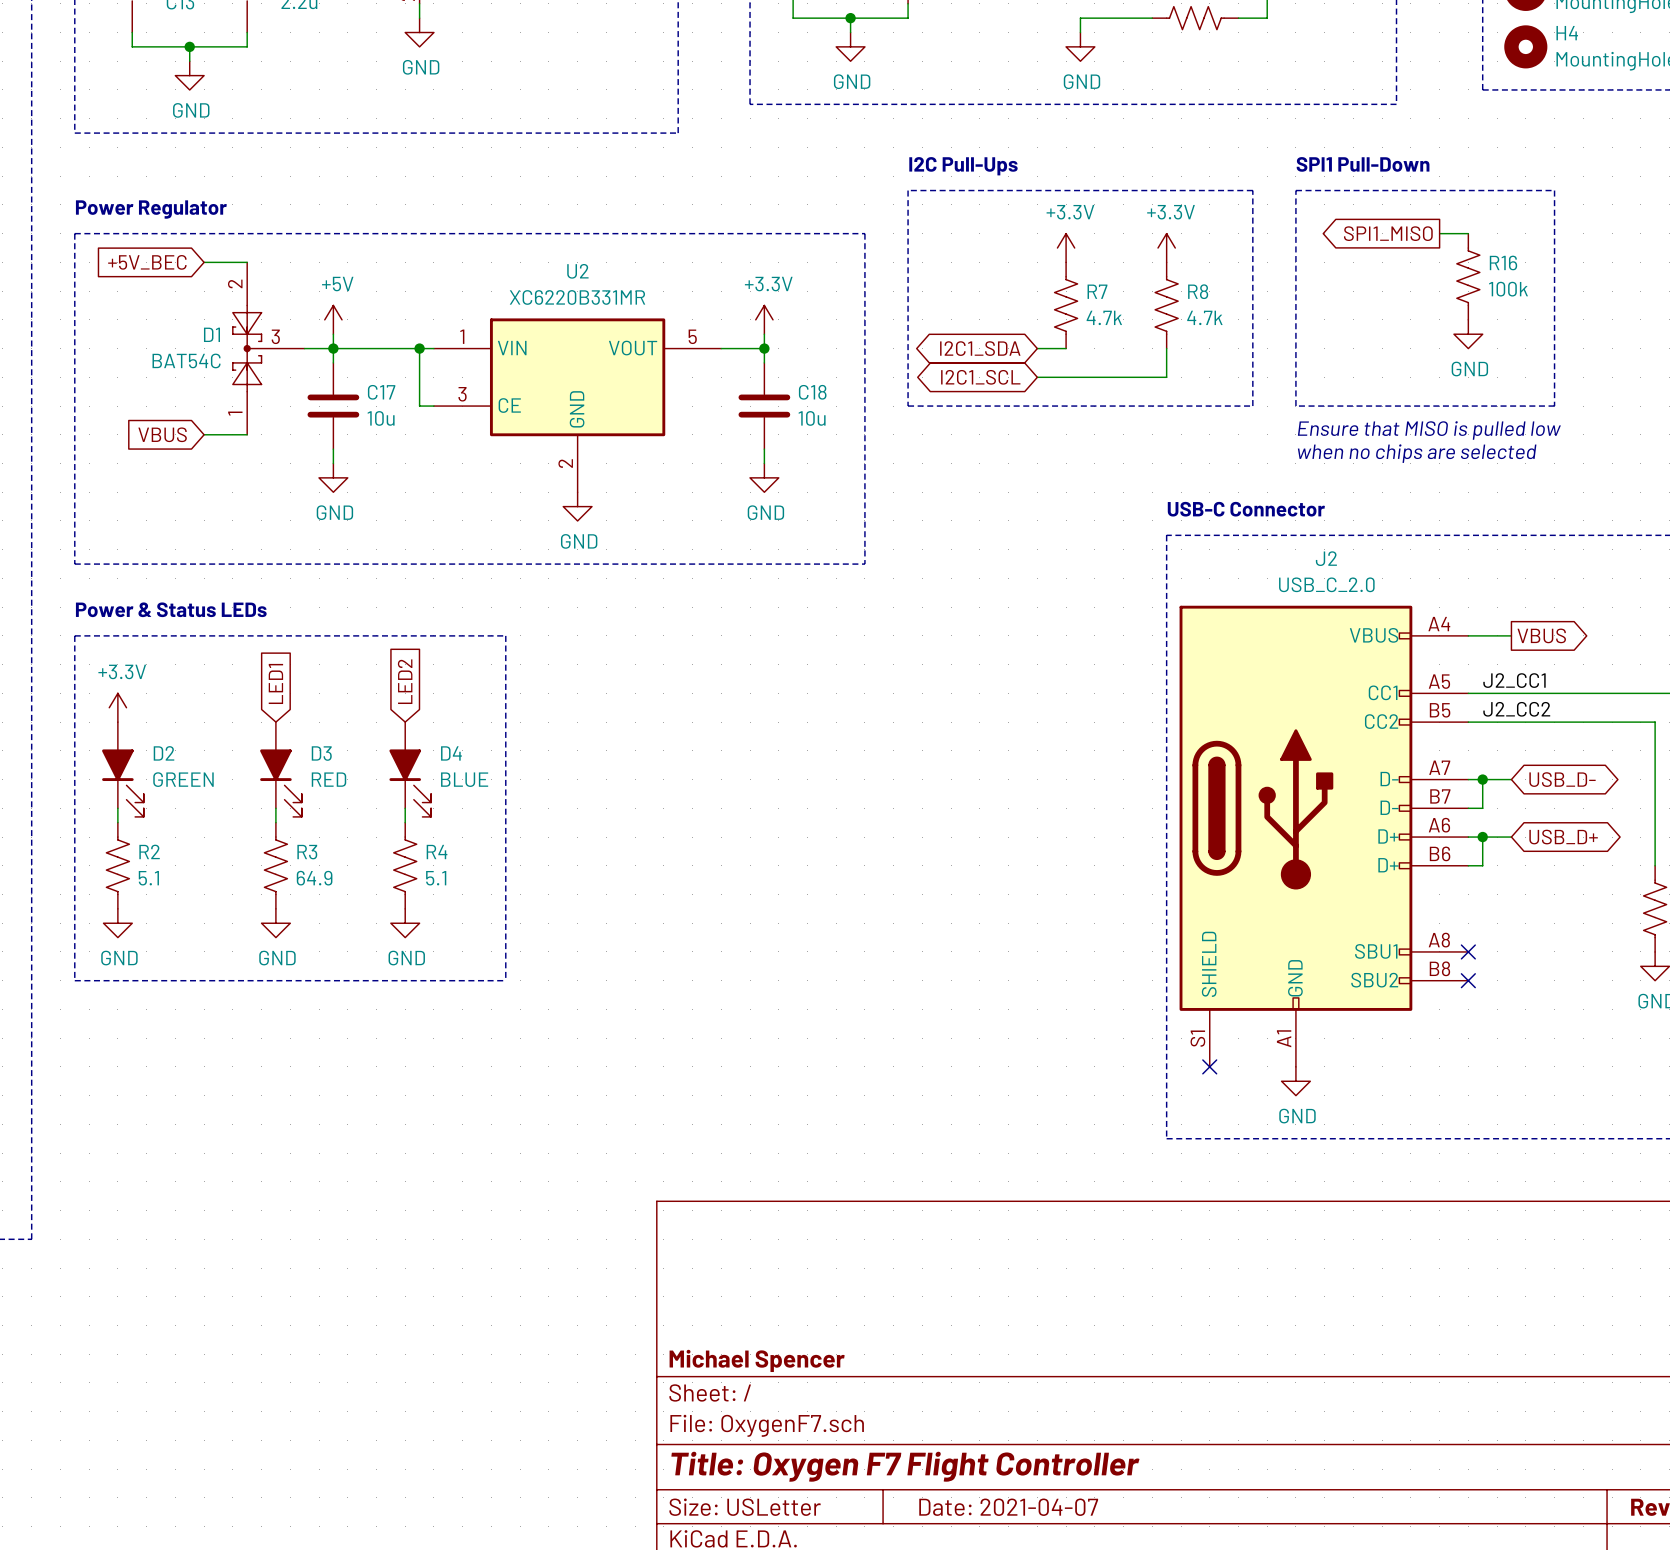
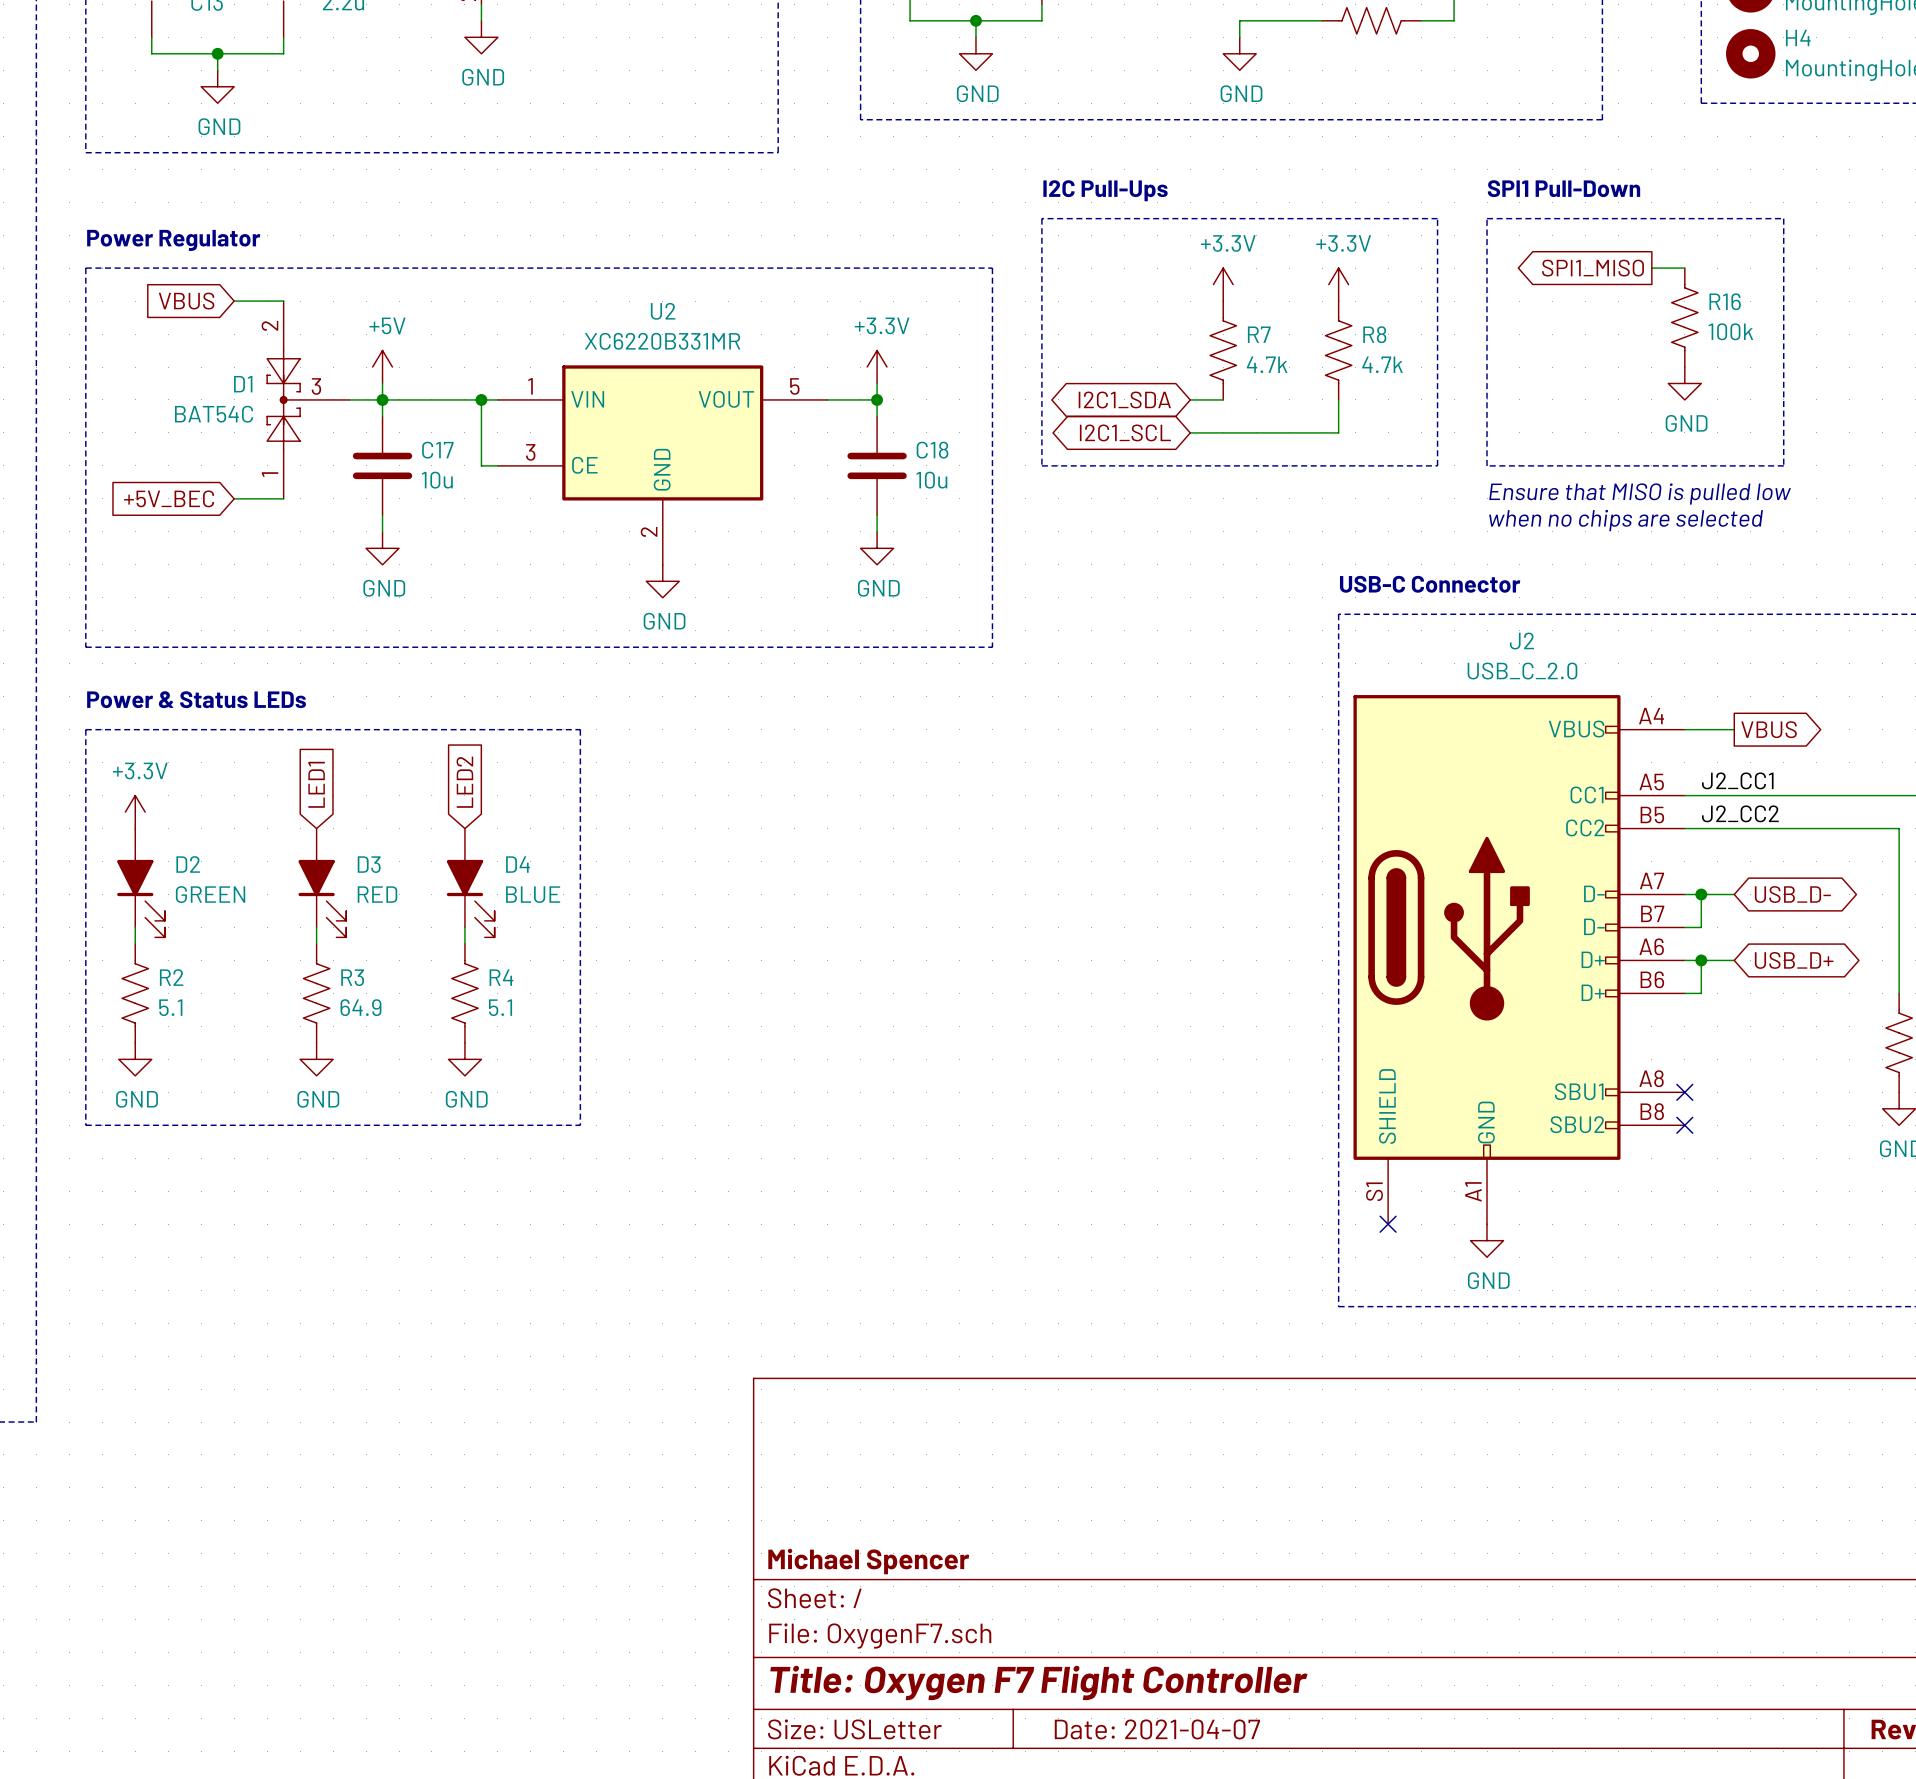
global label: +5V_BEC (147, 262) -> VBUS (186, 301)
global label: VBUS (162, 434) -> +5V_BEC (169, 498)

